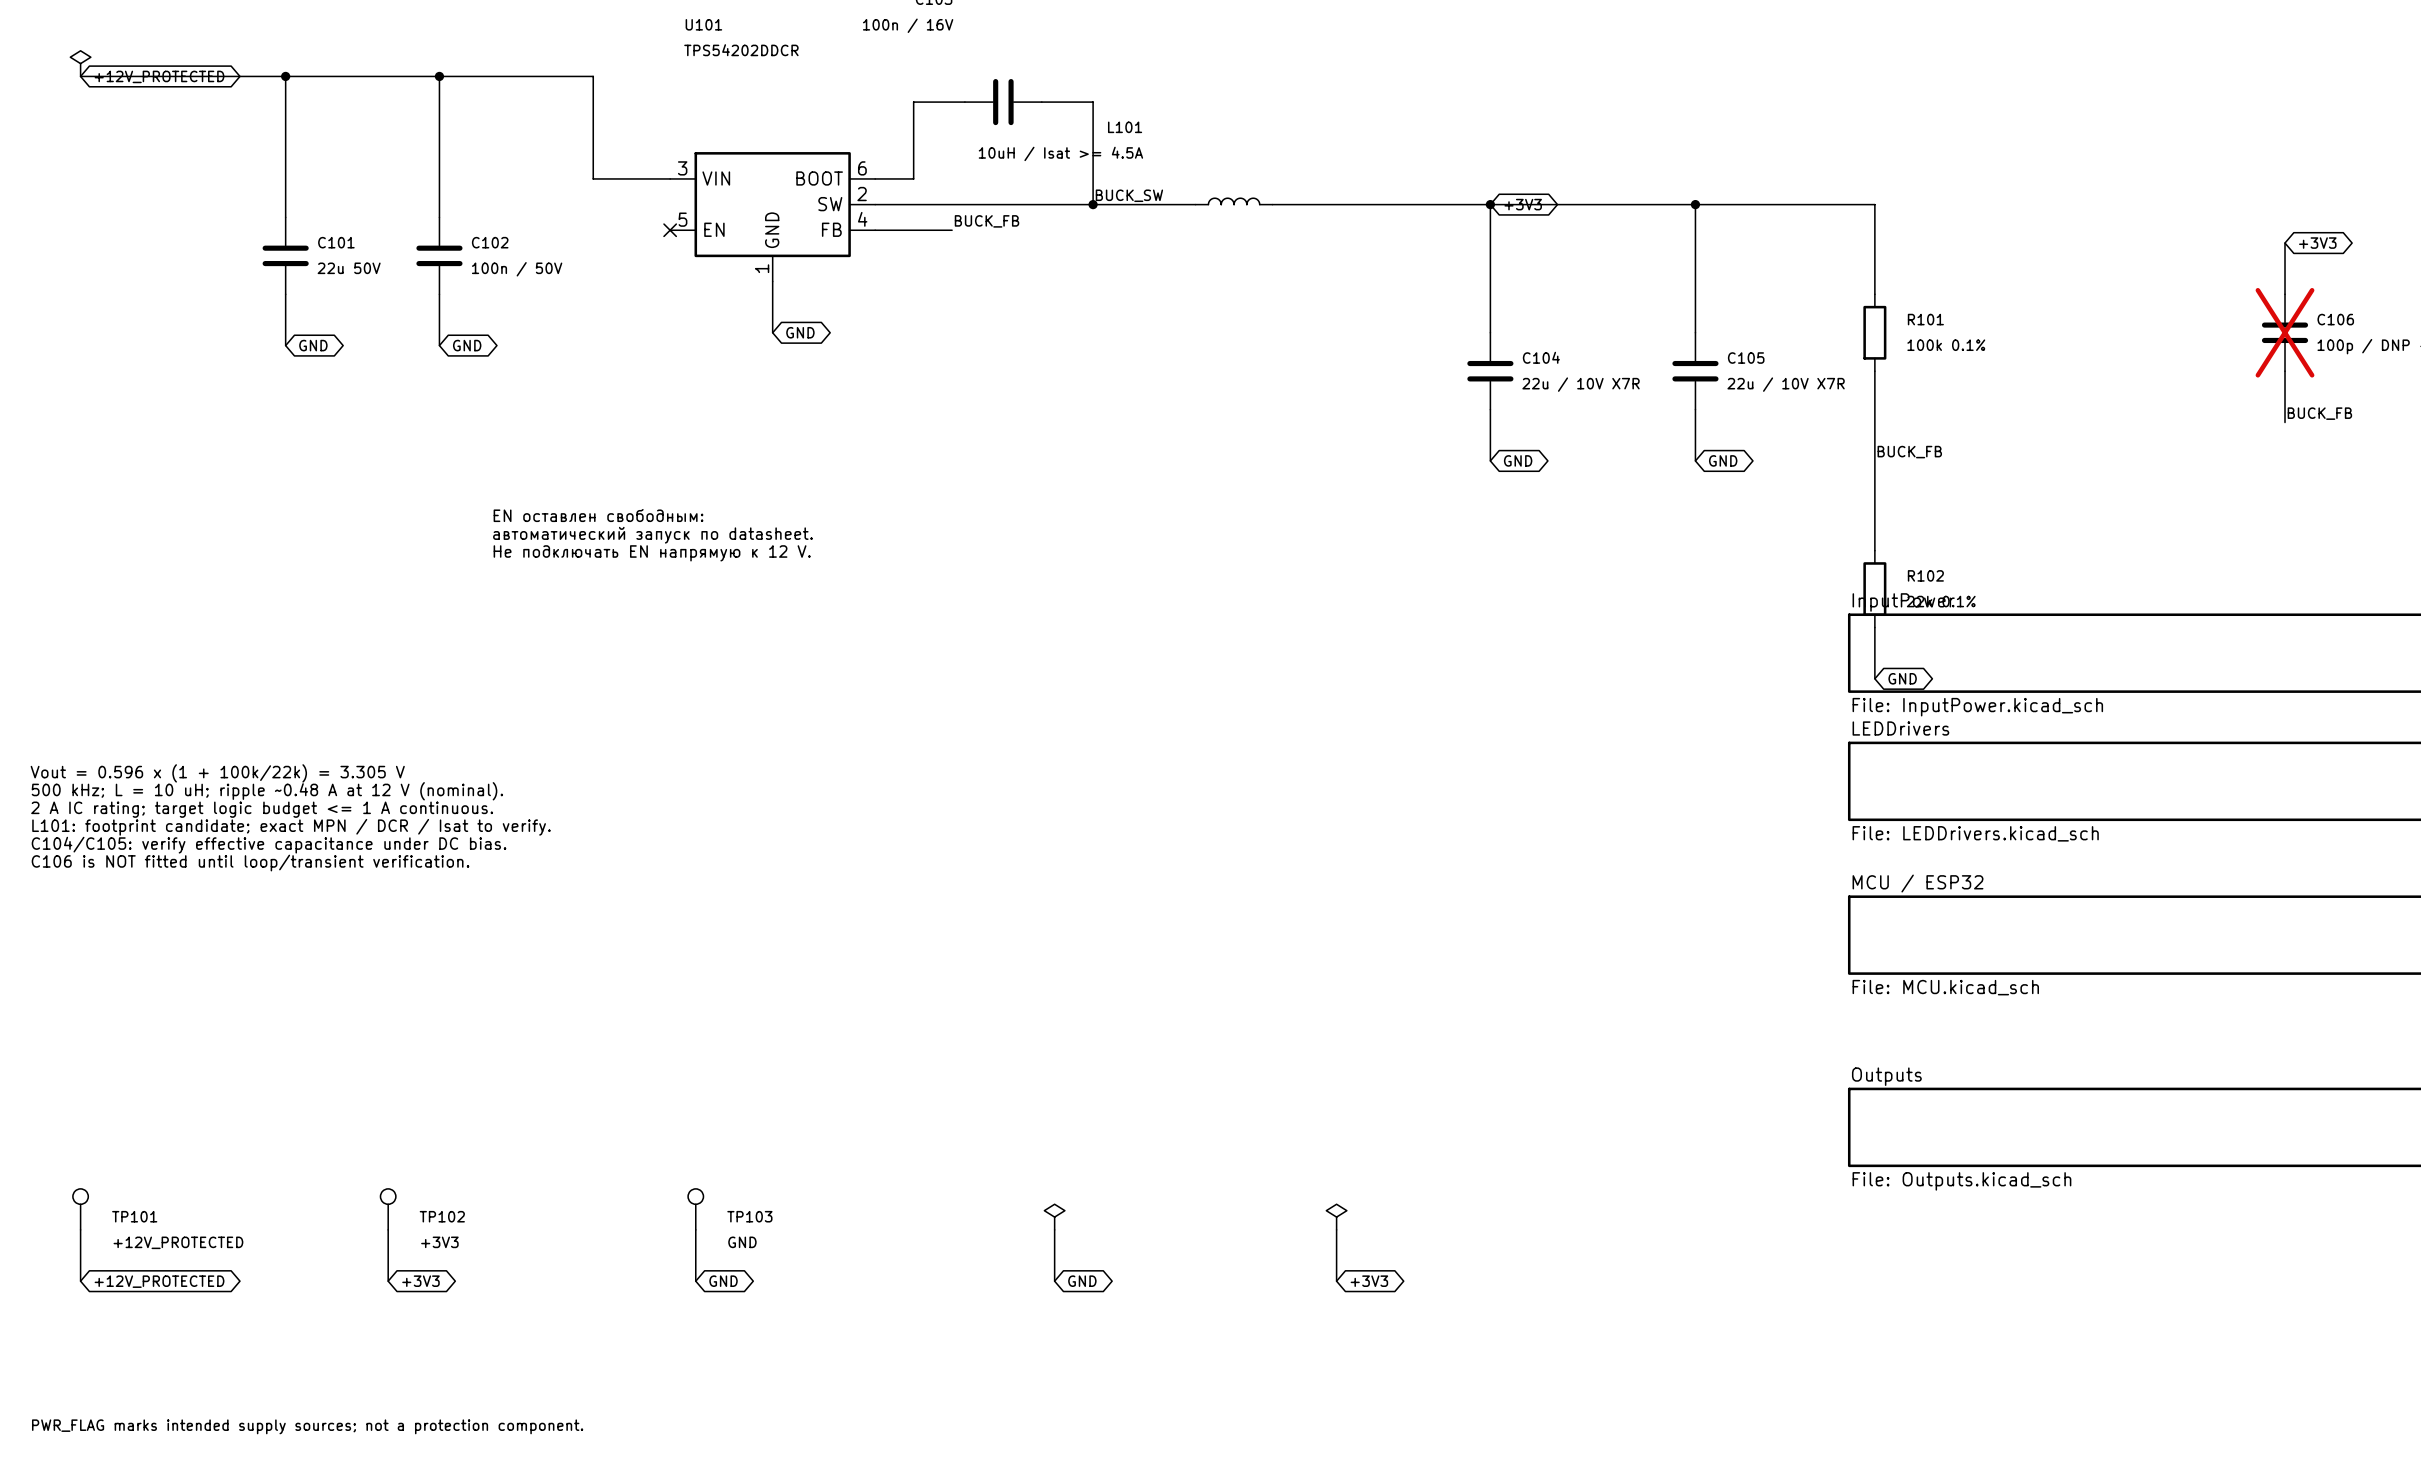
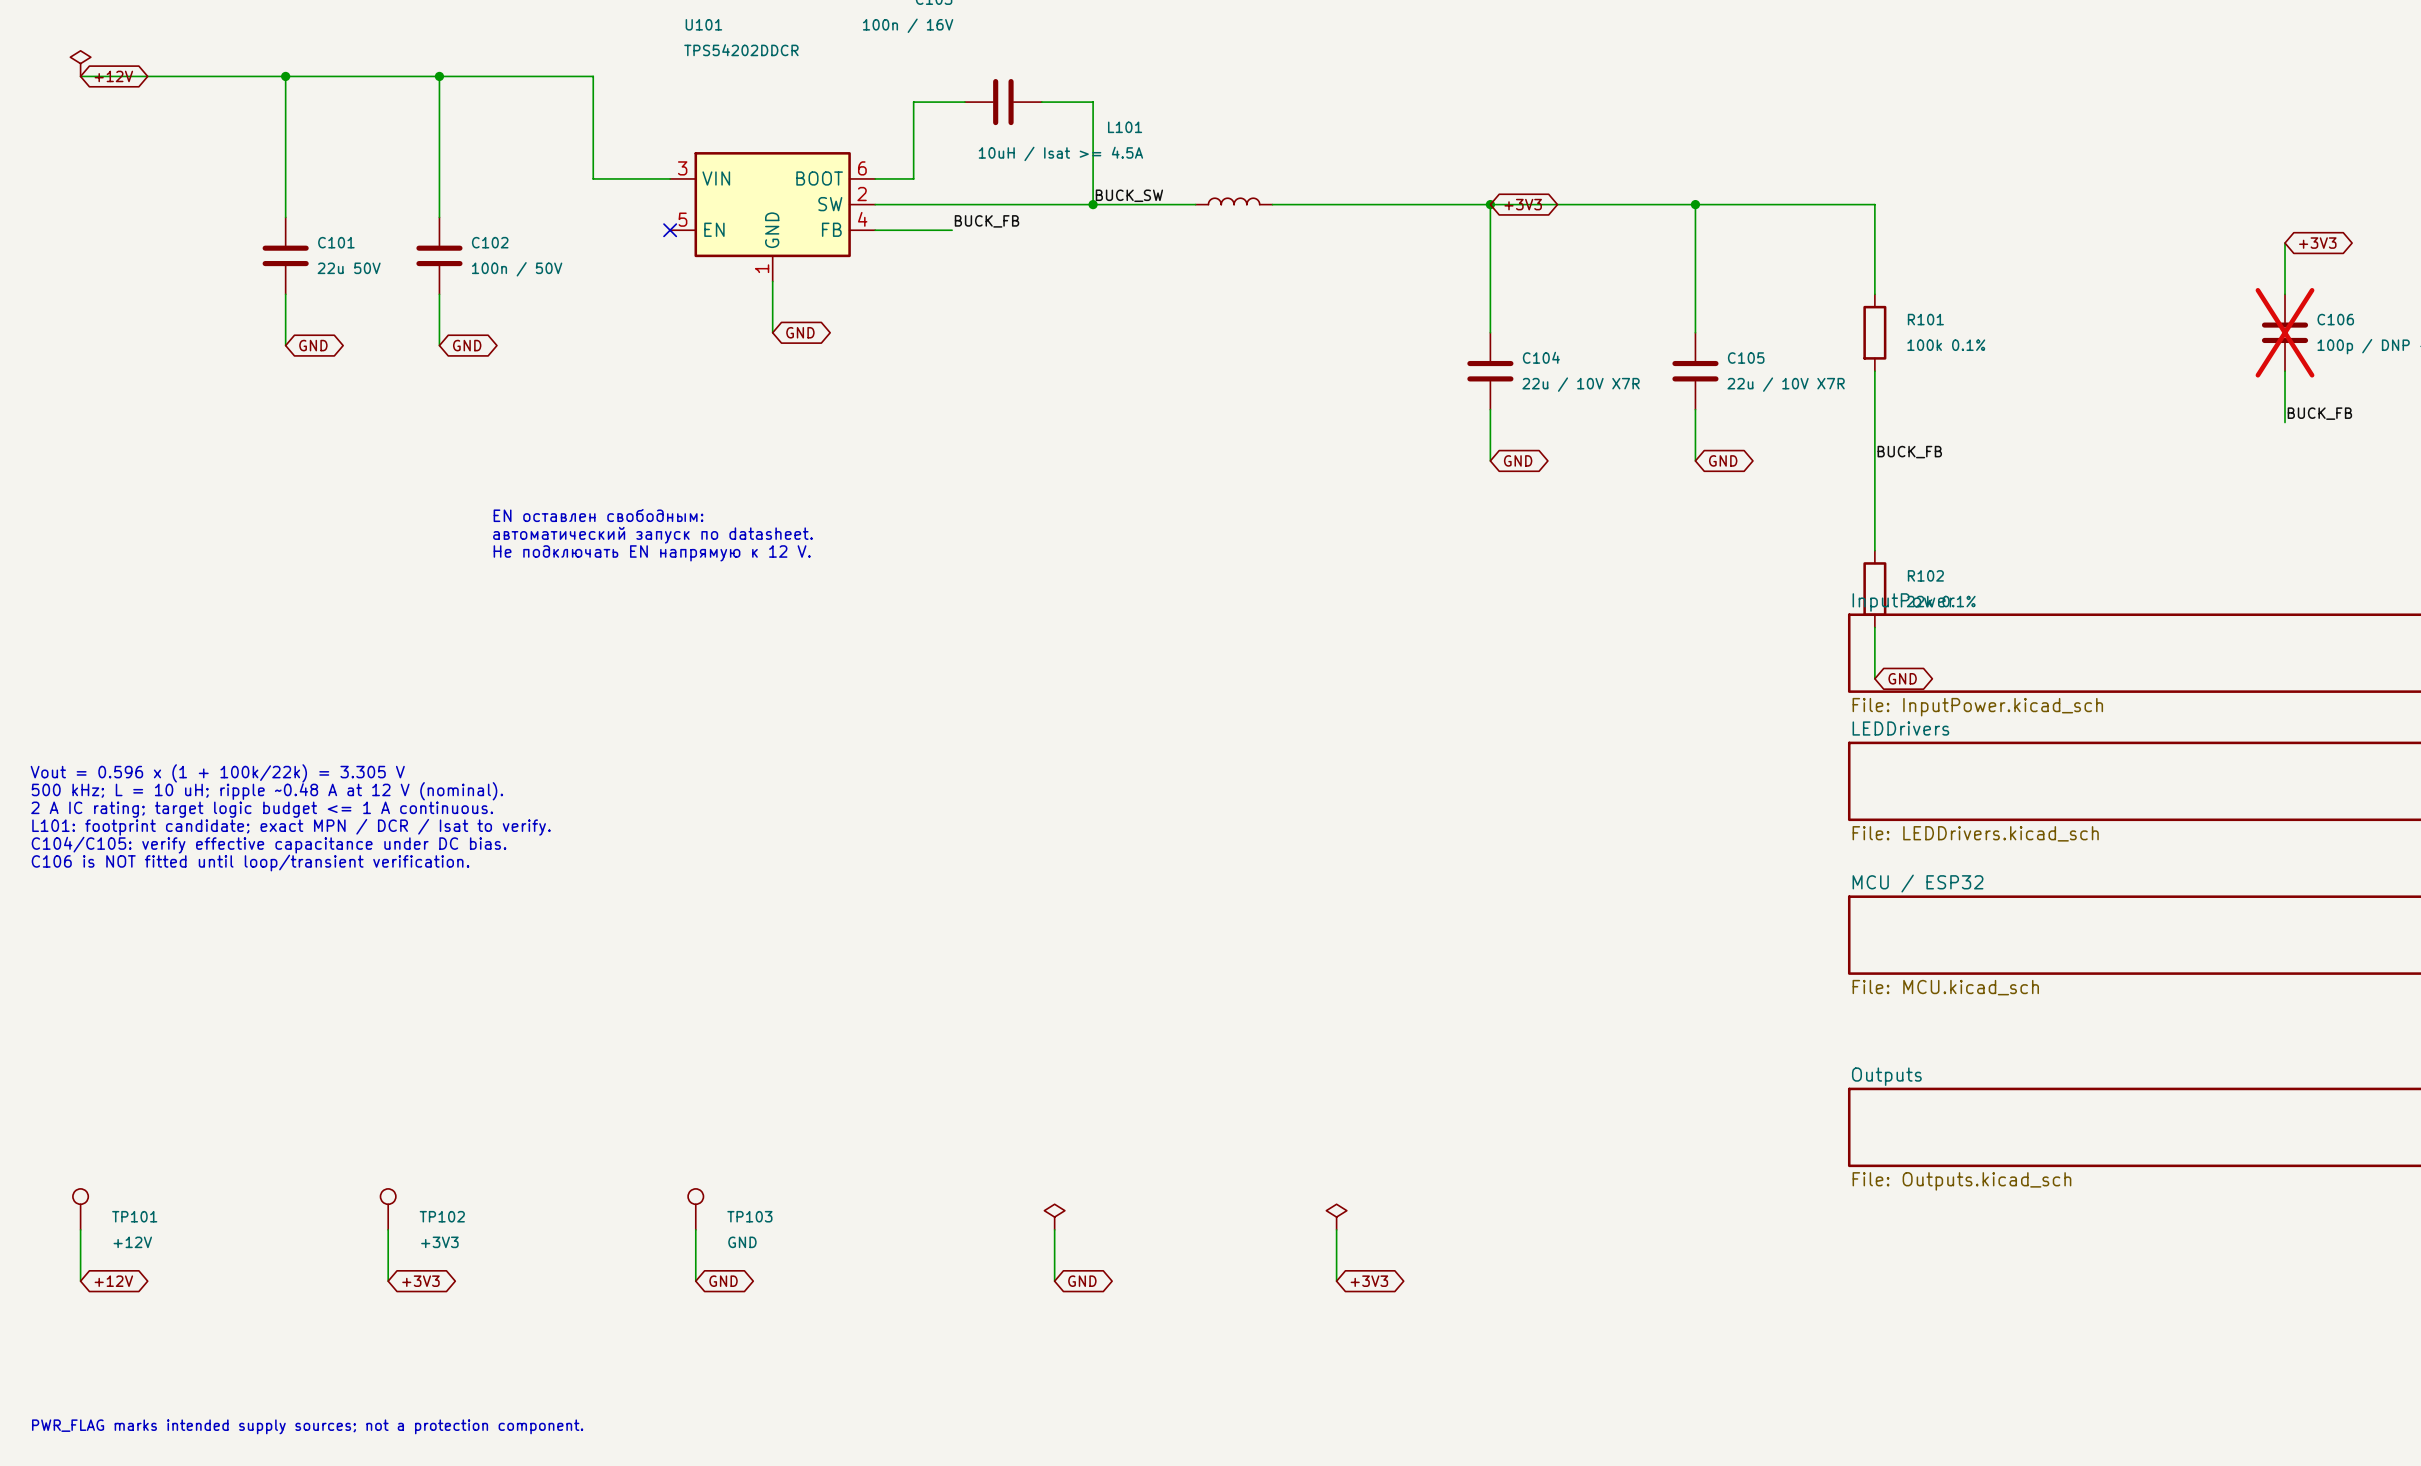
global label: +12V_PROTECTED (159, 76) -> +12V (113, 76)
TP101 value: +12V_PROTECTED (178, 1242) -> +12V (132, 1242)
global label: +12V_PROTECTED (159, 1281) -> +12V (113, 1281)

